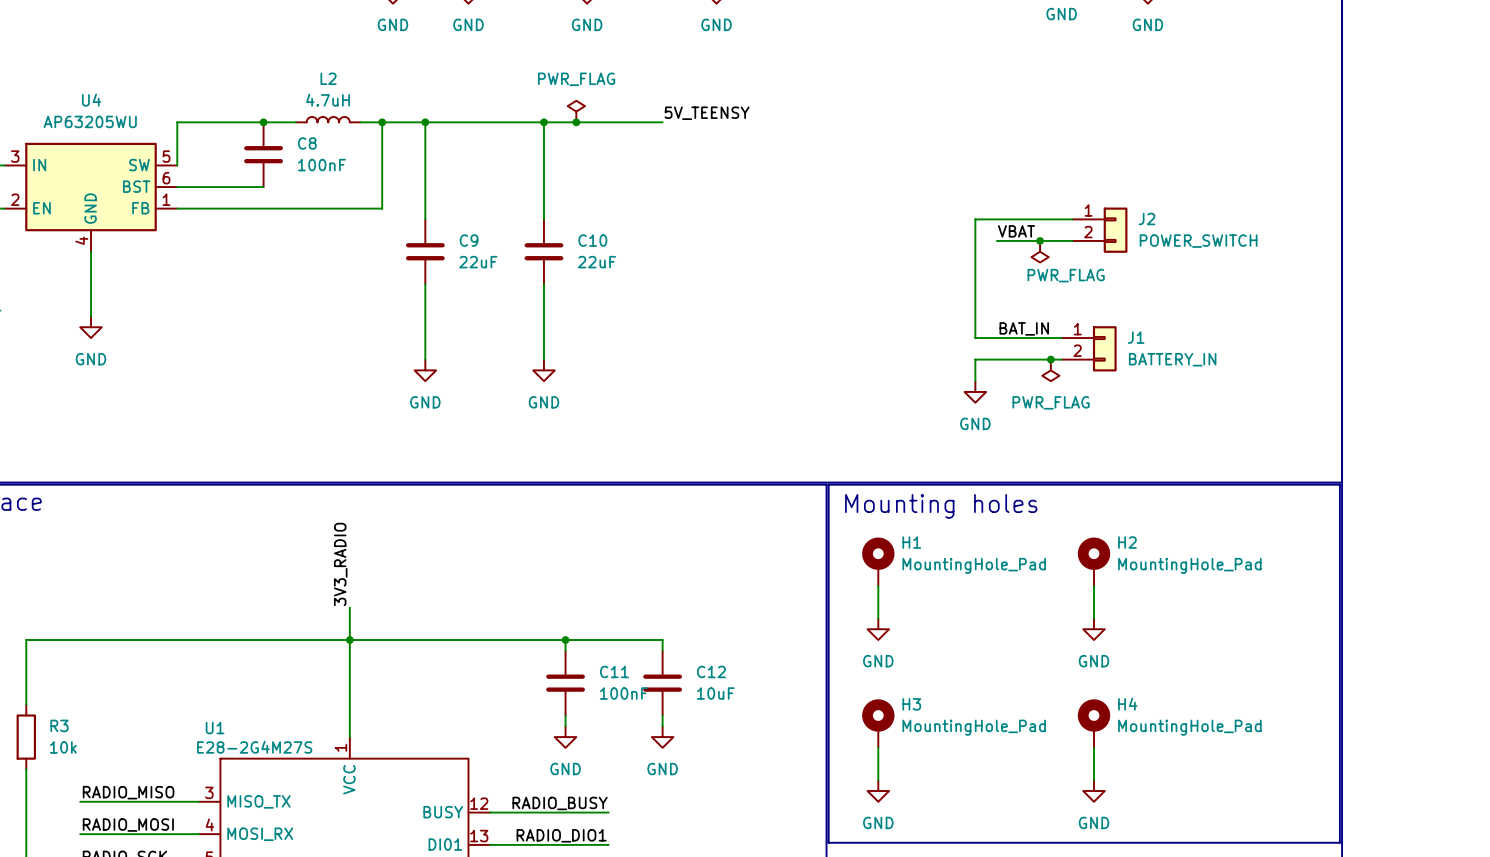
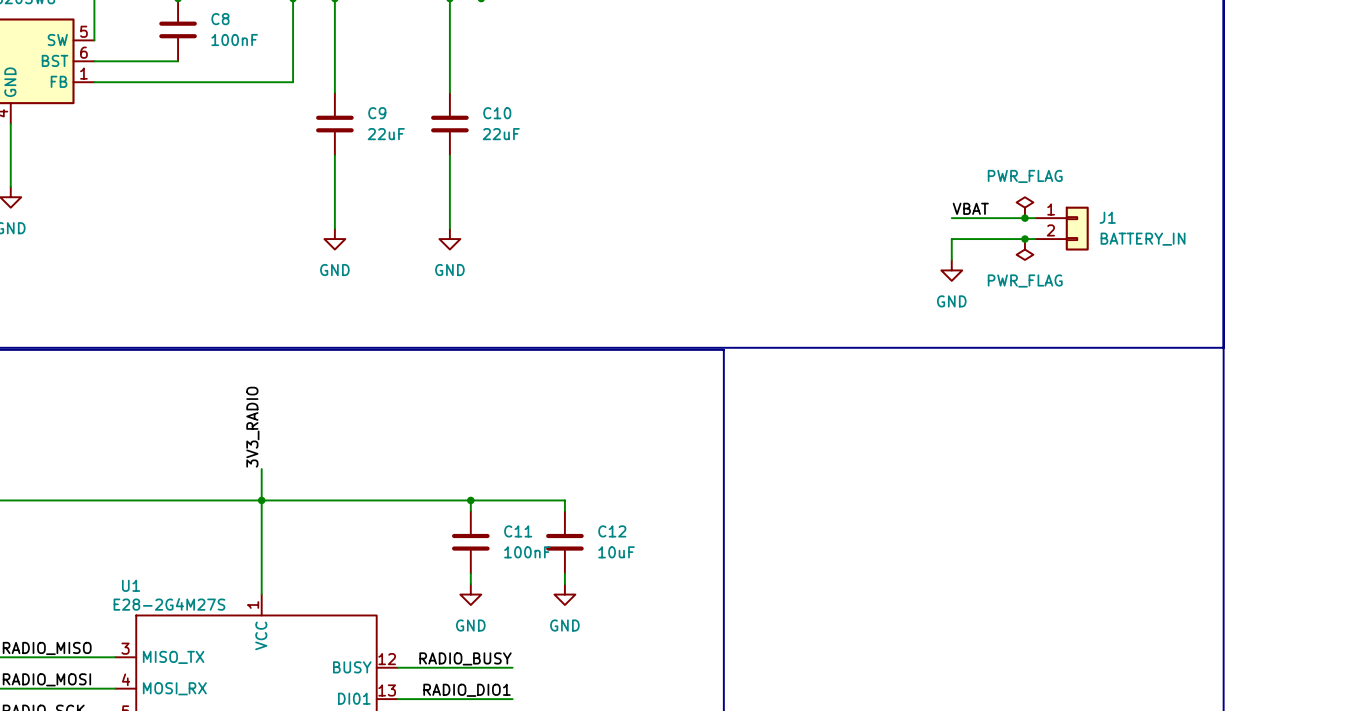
wire: (1072, 219) (975, 219) (975, 338) (1061, 338) -> none
J2: POWER_SWITCH (1099, 230) -> none
label position: VBAT (1016, 231) -> VBAT (970, 208)
wire: (996, 240) (1072, 240) -> none
junction: (1040, 240) -> none
power symbol: PWR_FLAG (1040, 251) -> none
label: BAT_IN (1024, 328) -> none
power symbol: none -> PWR_FLAG (1024, 207)
wire: none -> (951, 218) (1035, 218)
J1 position: (1089, 348) -> (1062, 228)
junction: none -> (1024, 218)
junction: (1050, 359) -> none
wire: (1061, 359) (975, 359) (975, 381) -> (1035, 239) (951, 239) (951, 259)
power symbol: PWR_FLAG (1050, 370) -> none
junction: none -> (1024, 239)
power symbol: none -> PWR_FLAG (1024, 249)
power symbol position: GND (975, 391) -> GND (951, 270)
line: (828, 484) (1339, 484) (1339, 842) (828, 842) (828, 484) -> none
text: Mounting holes (941, 506) -> none
H1: MountingHole_Pad (878, 561) -> none
H2: MountingHole_Pad (1094, 561) -> none
wire: (878, 586) (878, 618) -> none
wire: (1094, 586) (1094, 618) -> none
power symbol: GND (878, 629) -> none
power symbol: GND (1094, 629) -> none
H3: MountingHole_Pad (878, 723) -> none
H4: MountingHole_Pad (1094, 723) -> none
wire: (878, 747) (878, 780) -> none
wire: (1094, 747) (1094, 780) -> none
power symbol: GND (878, 791) -> none
power symbol: GND (1094, 791) -> none

